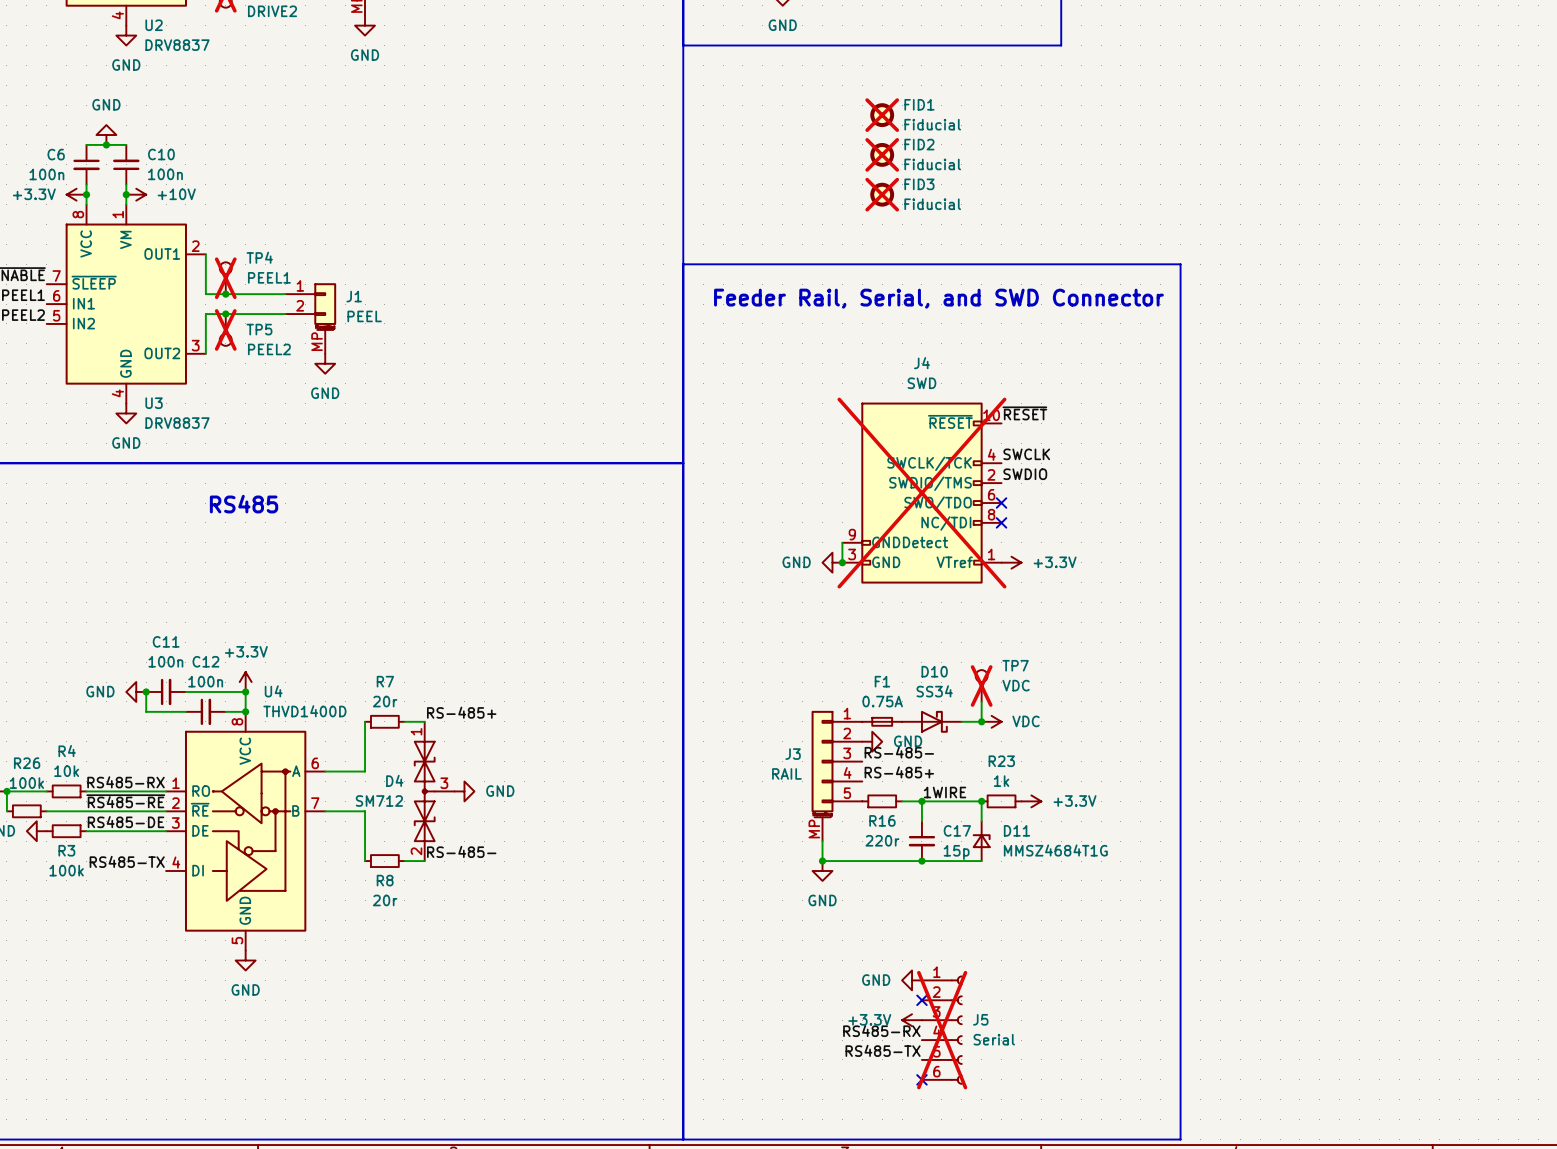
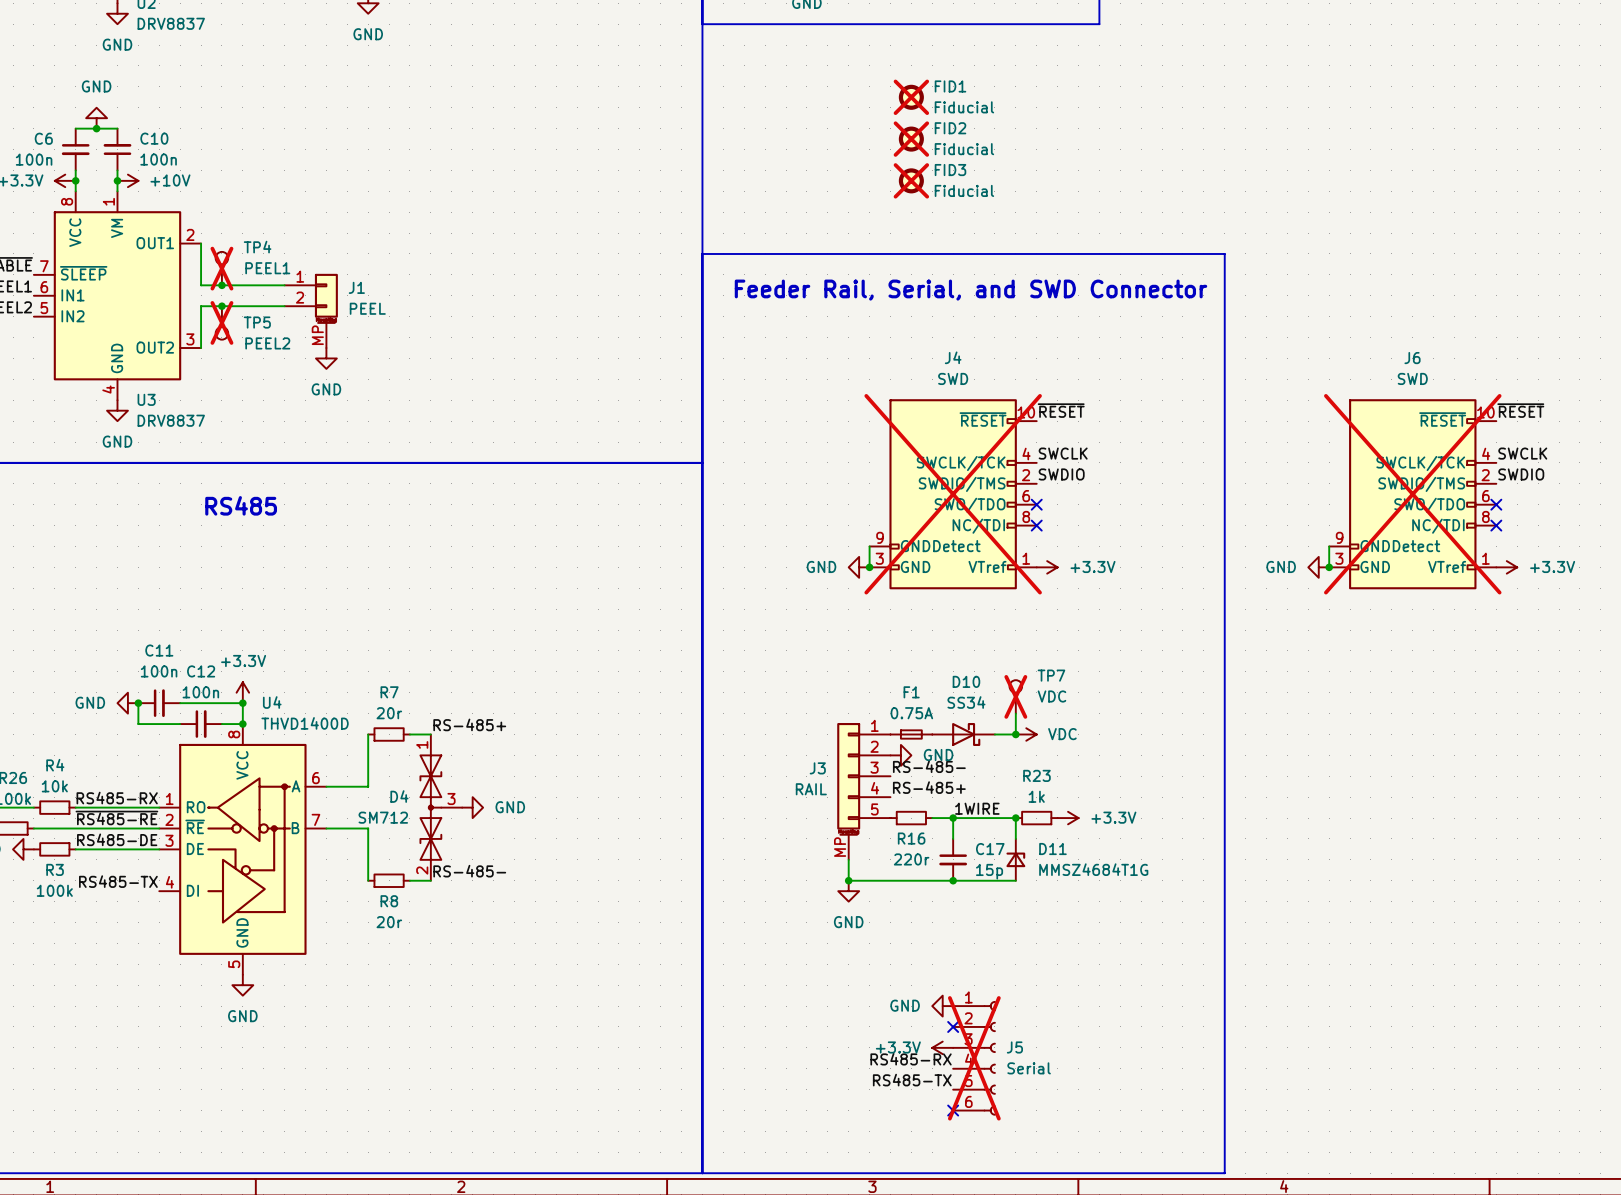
label: none -> ~{RESET} (1520, 410)
label: none -> SWCLK (1522, 453)
label: none -> SWDIO (1521, 474)
J6: none -> SWD (1412, 494)
no-connect mark: none -> (1496, 504)
no-connect mark: none -> (1496, 525)
wire: none -> (1329, 546) (1329, 567)
power symbol: none -> GND (1318, 567)
junction: none -> (1329, 567)
power symbol: none -> +3.3V (1506, 567)

